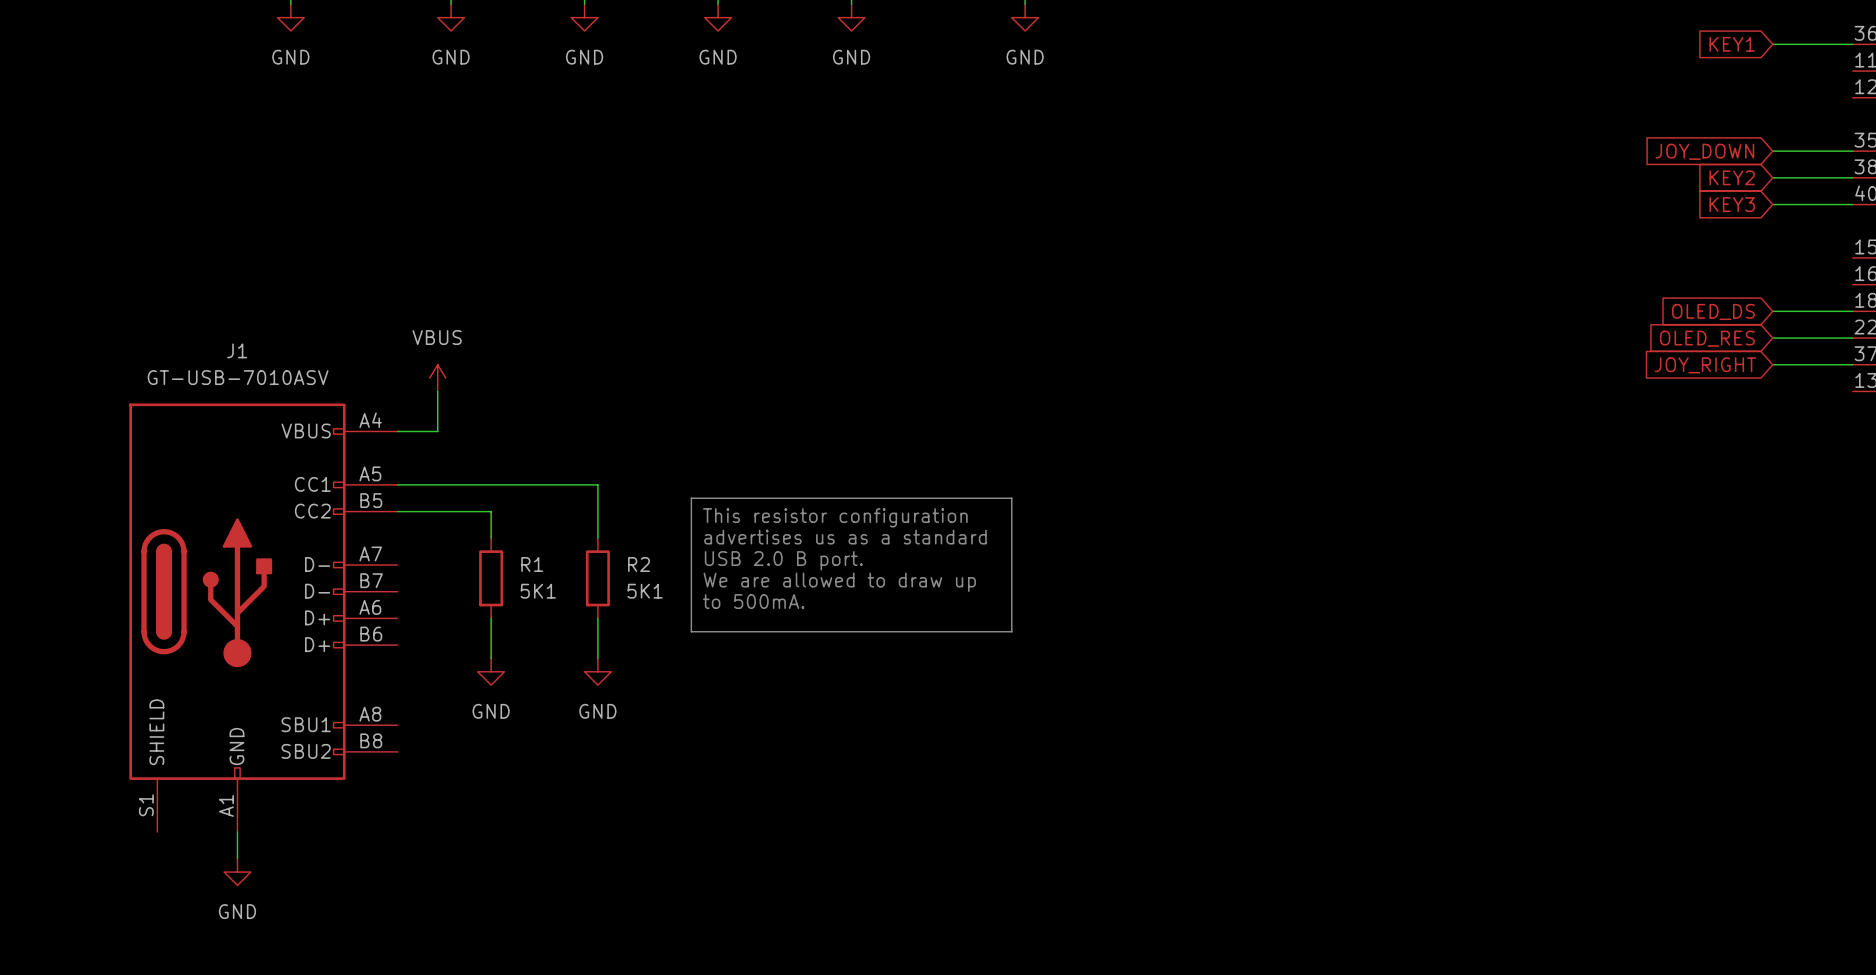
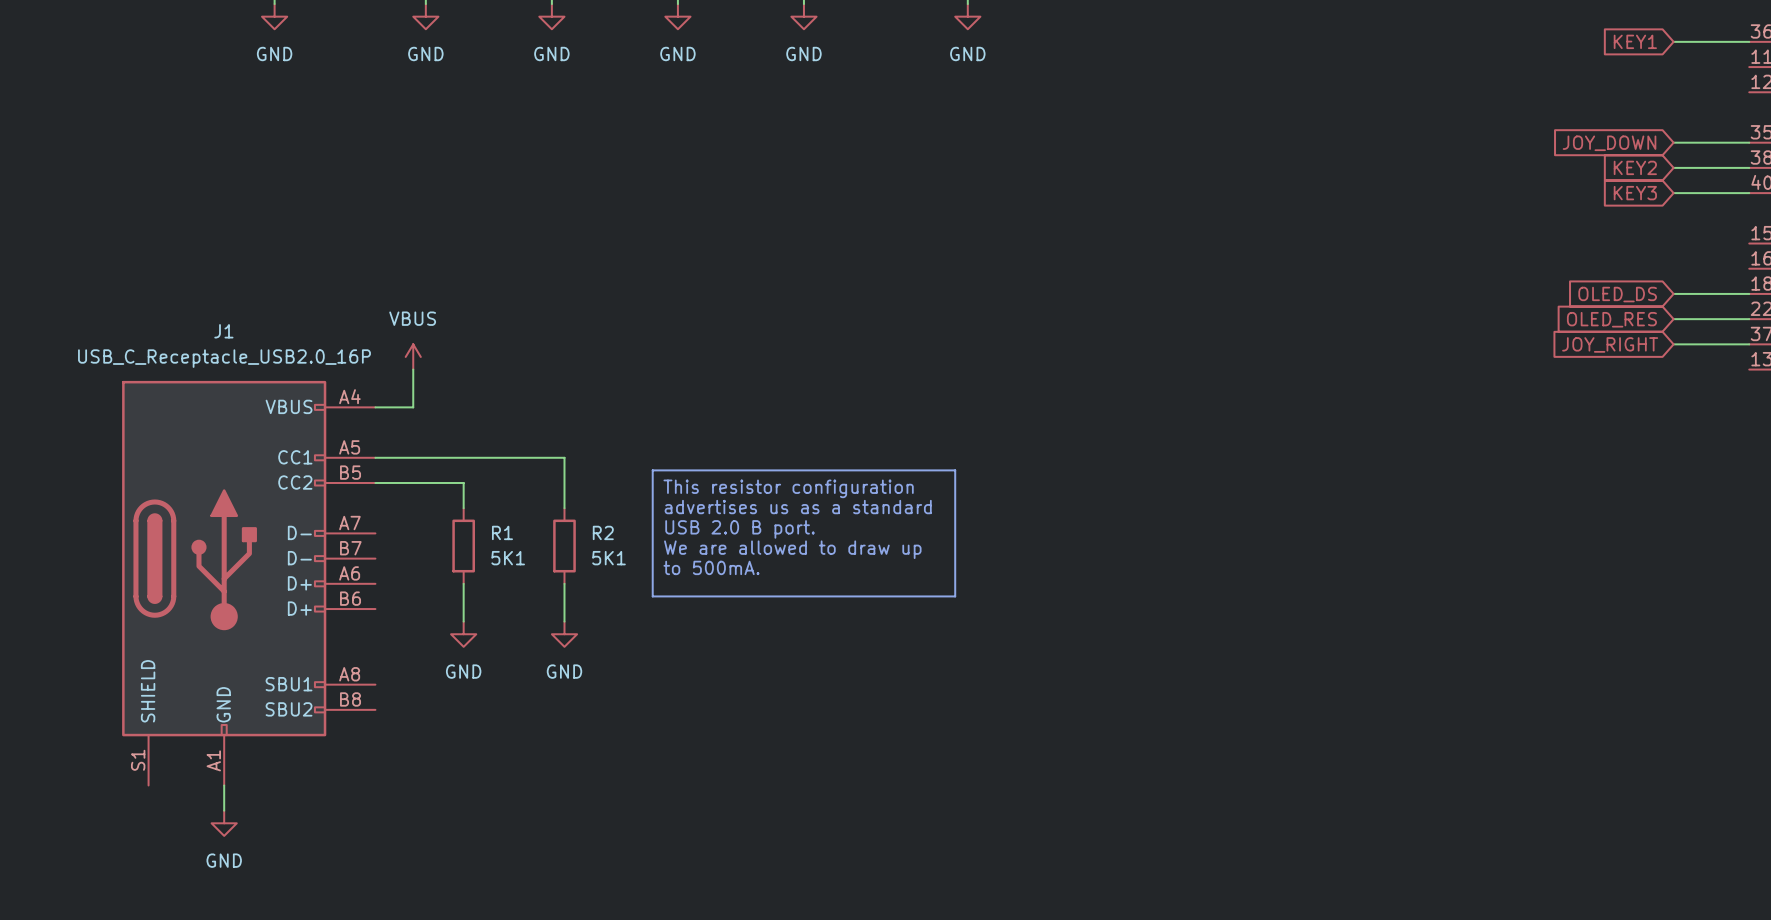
J1 value: GT-USB-7010ASV (238, 377) -> USB_C_Receptacle_USB2.0_16P (224, 358)

